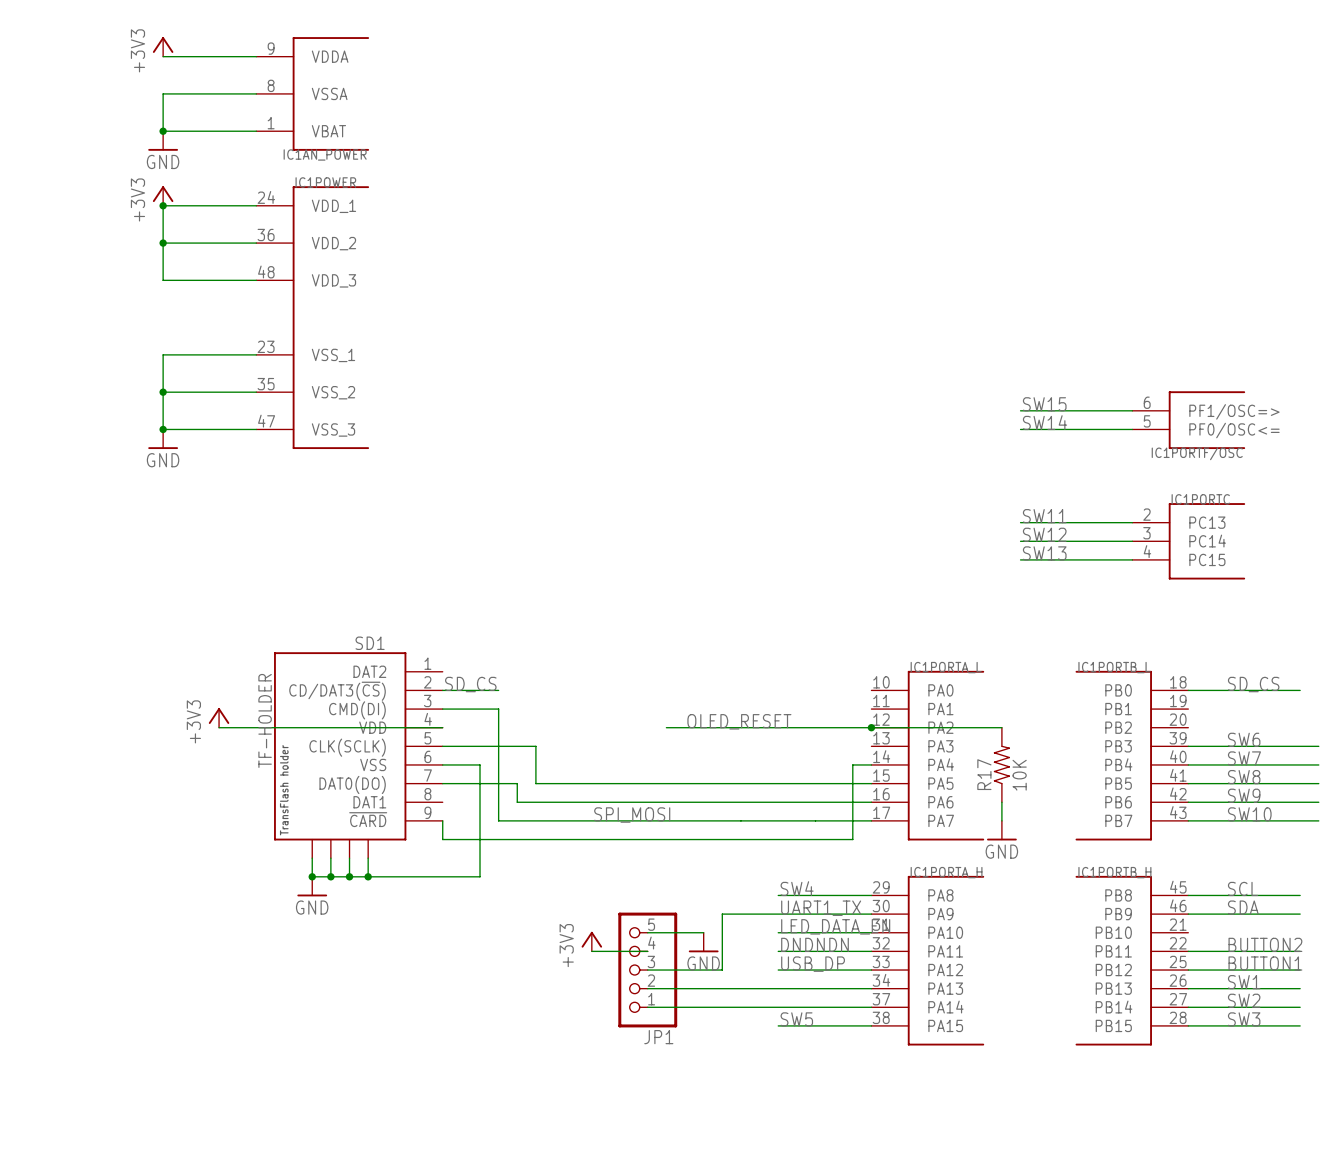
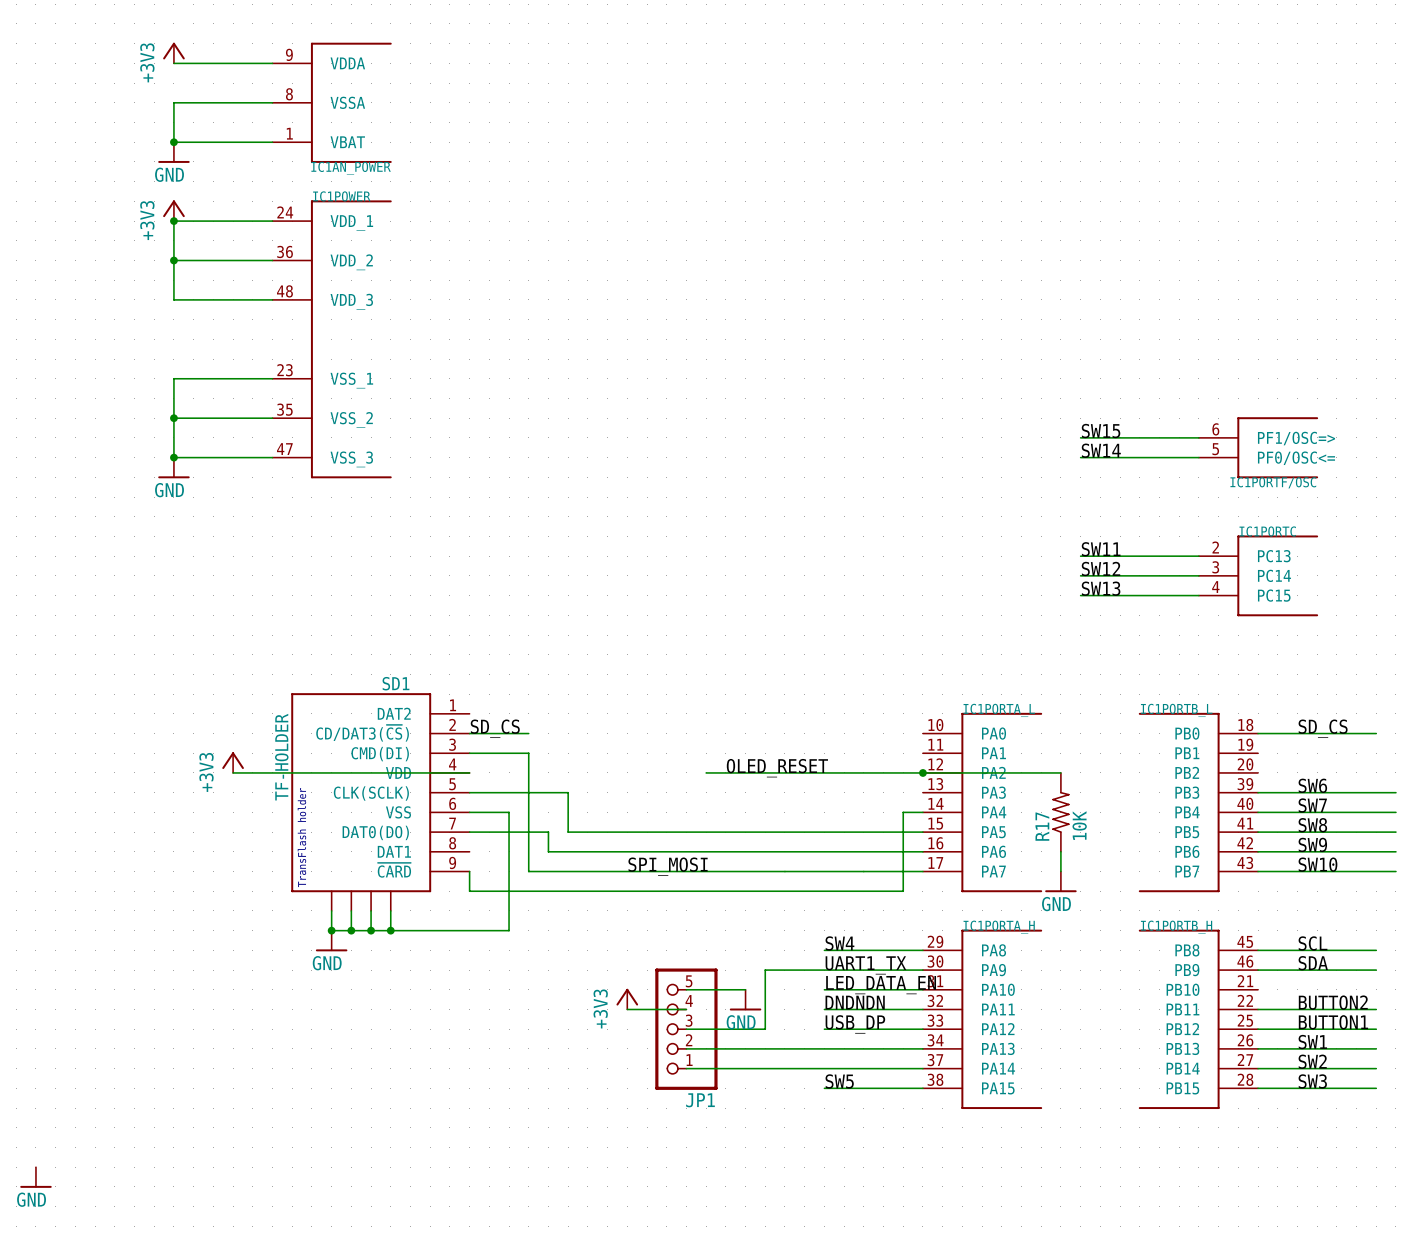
power symbol: none -> GND (35, 1177)

